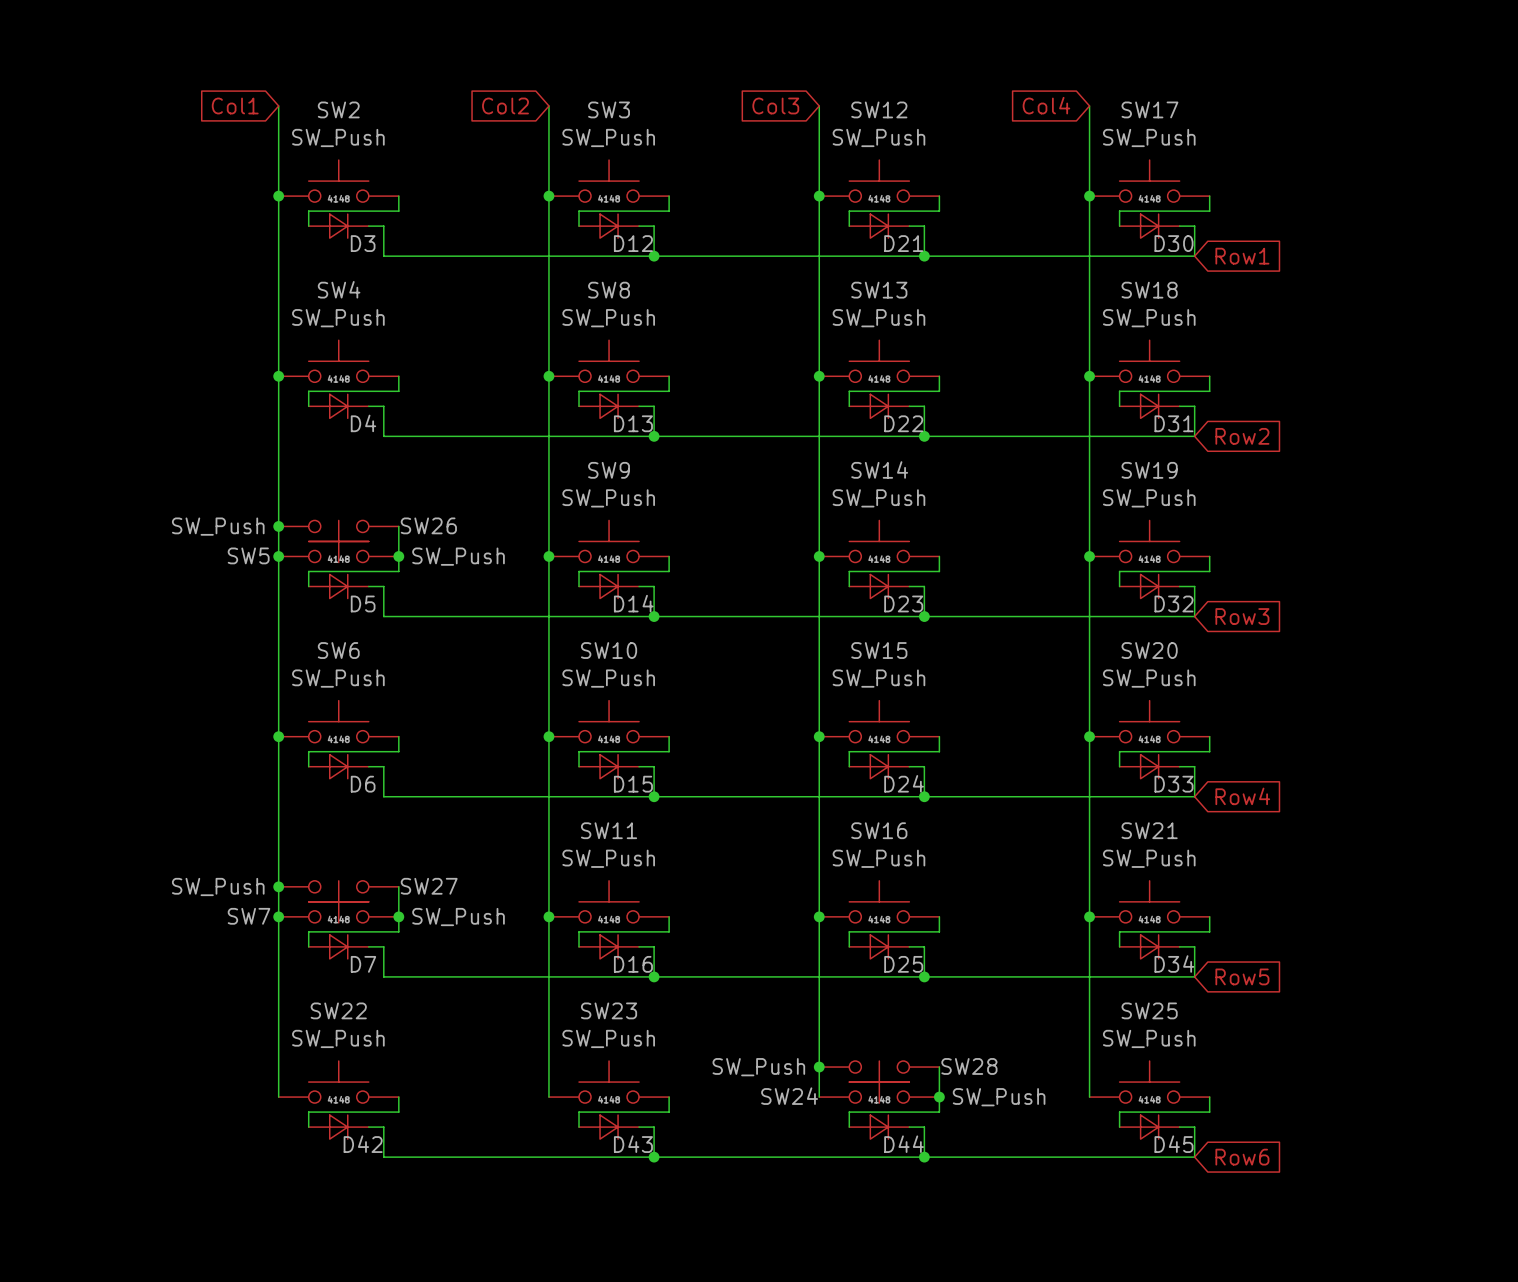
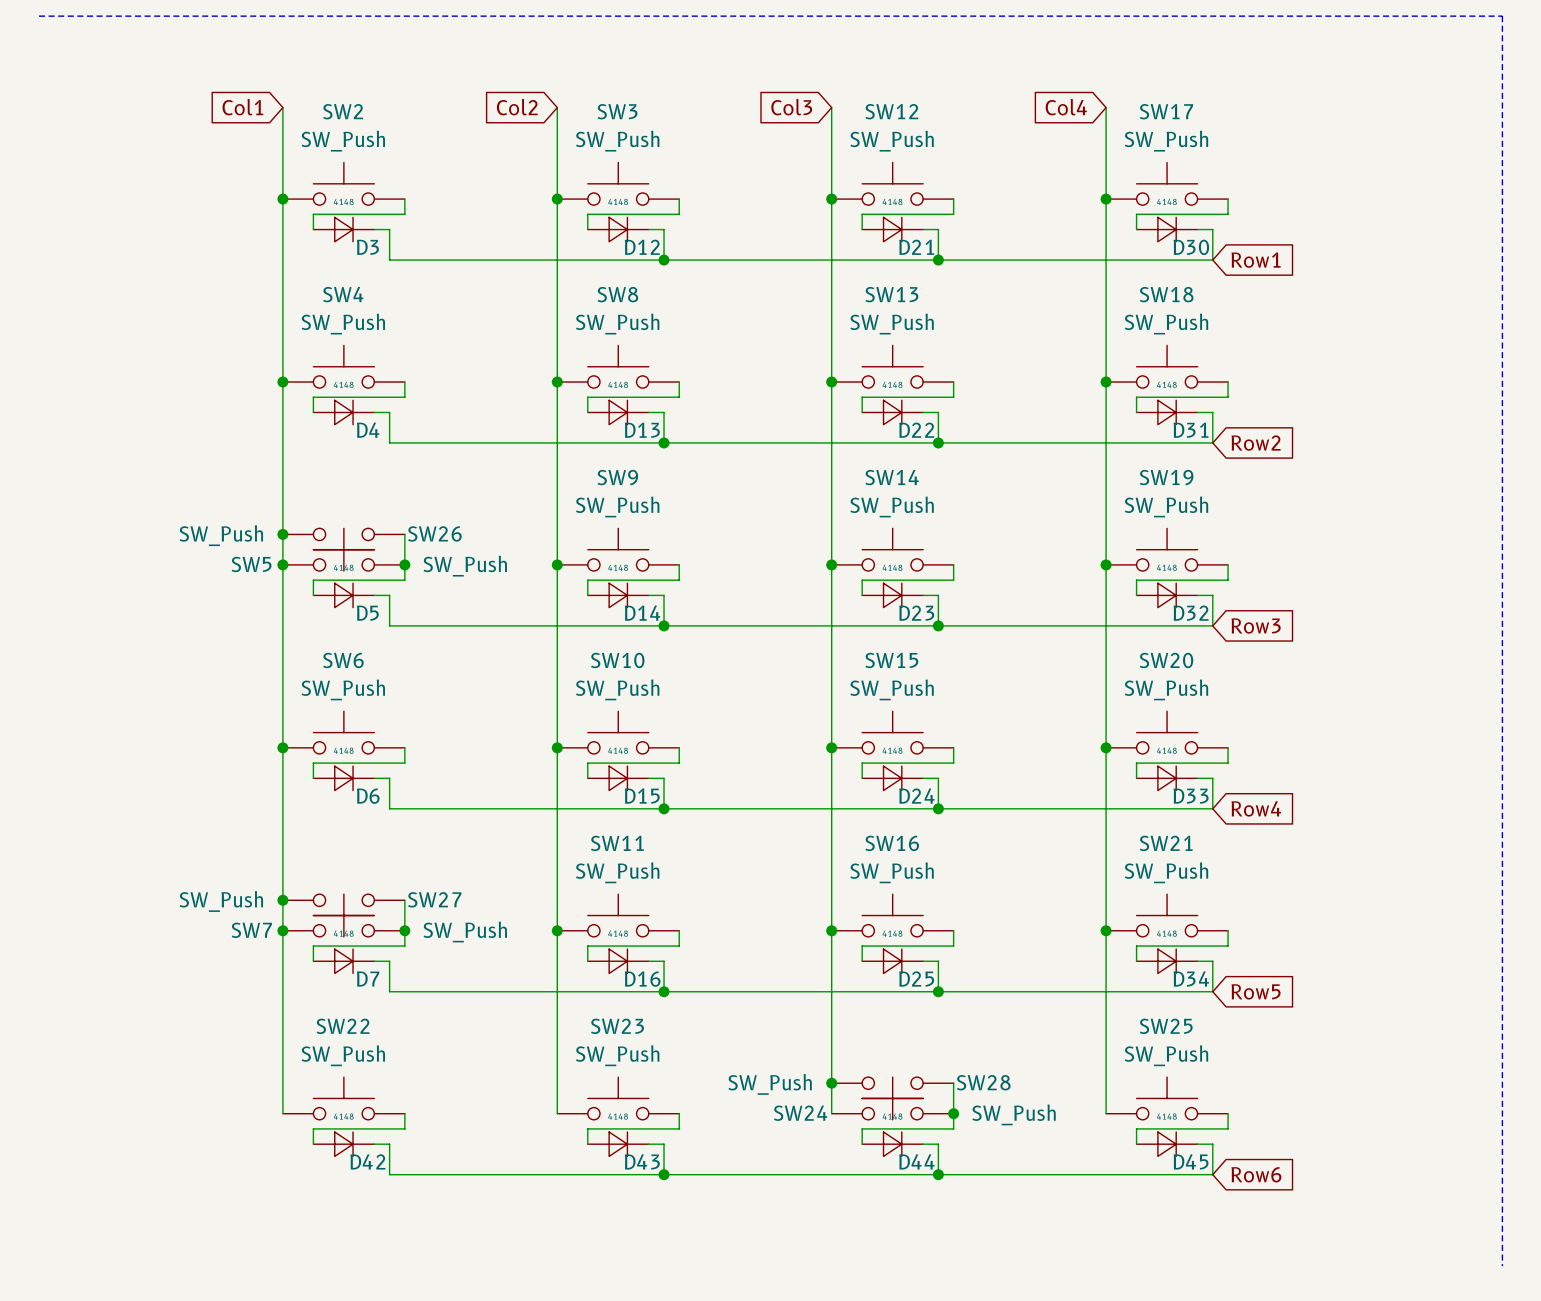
line: none -> (39, 16) (1502, 16) (1502, 1266)

